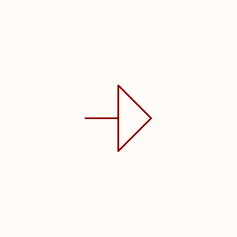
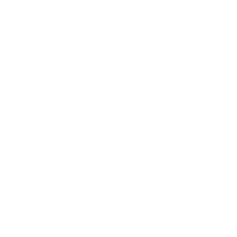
power symbol: (118, 118) -> none

